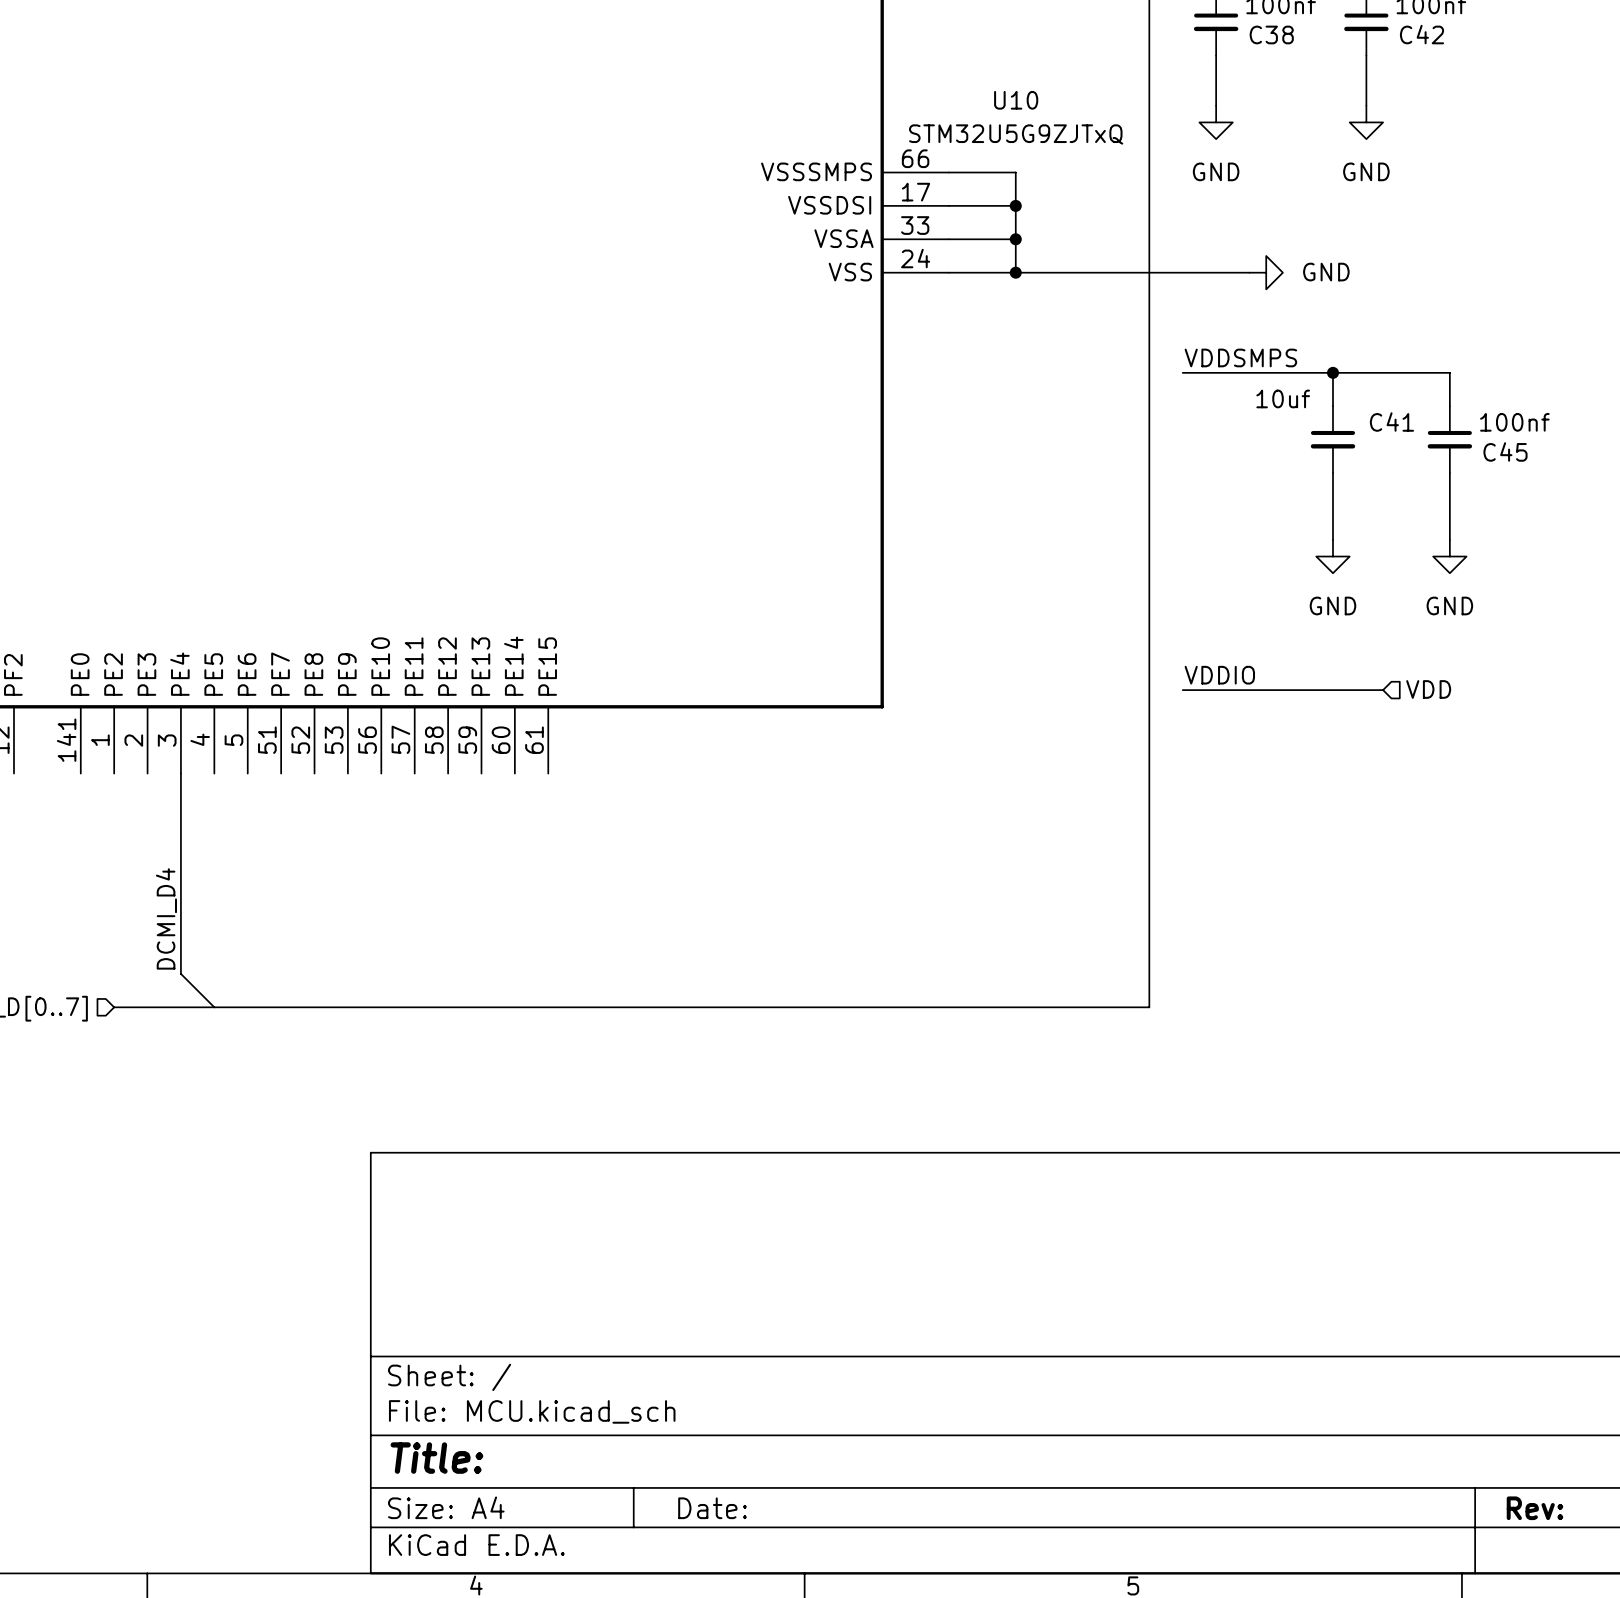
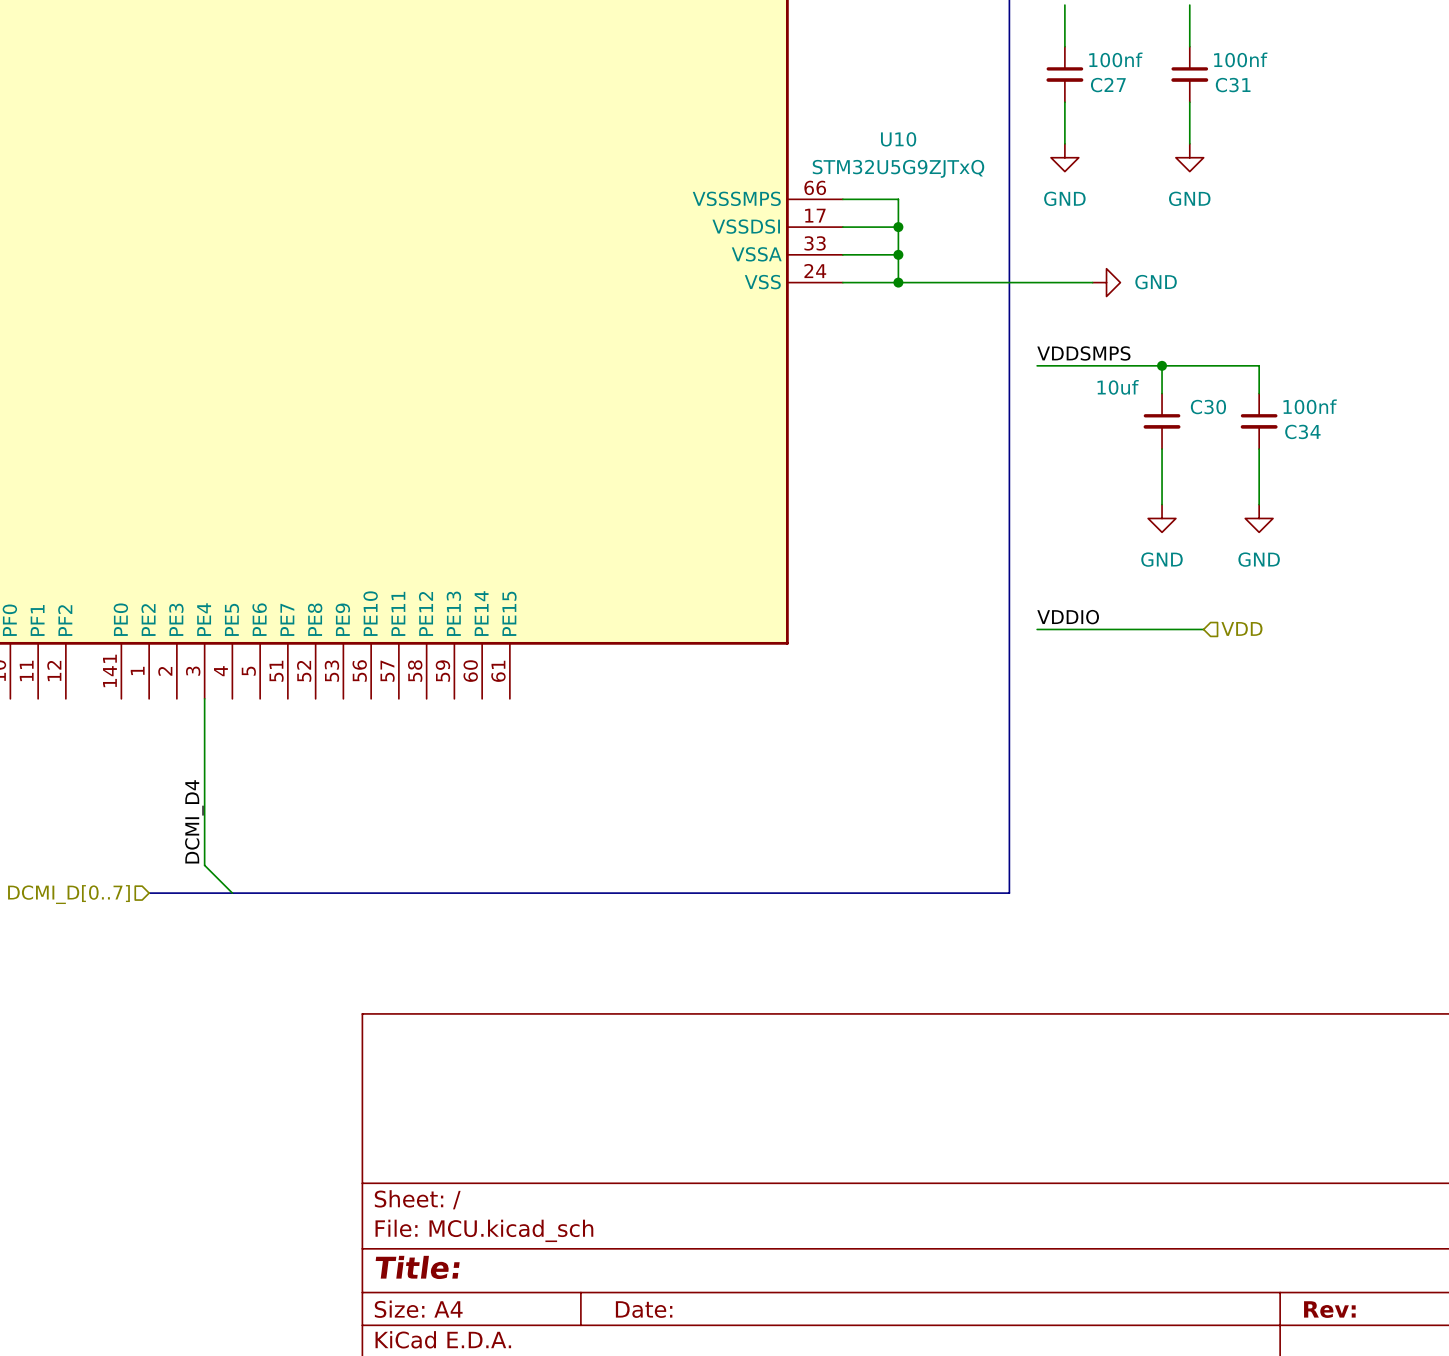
C38 name: C38 (1271, 34) -> C27 (1108, 85)
C42 name: C42 (1422, 34) -> C31 (1233, 85)
C41 name: C41 (1391, 422) -> C30 (1208, 407)
C45 name: C45 (1505, 451) -> C34 (1302, 431)

